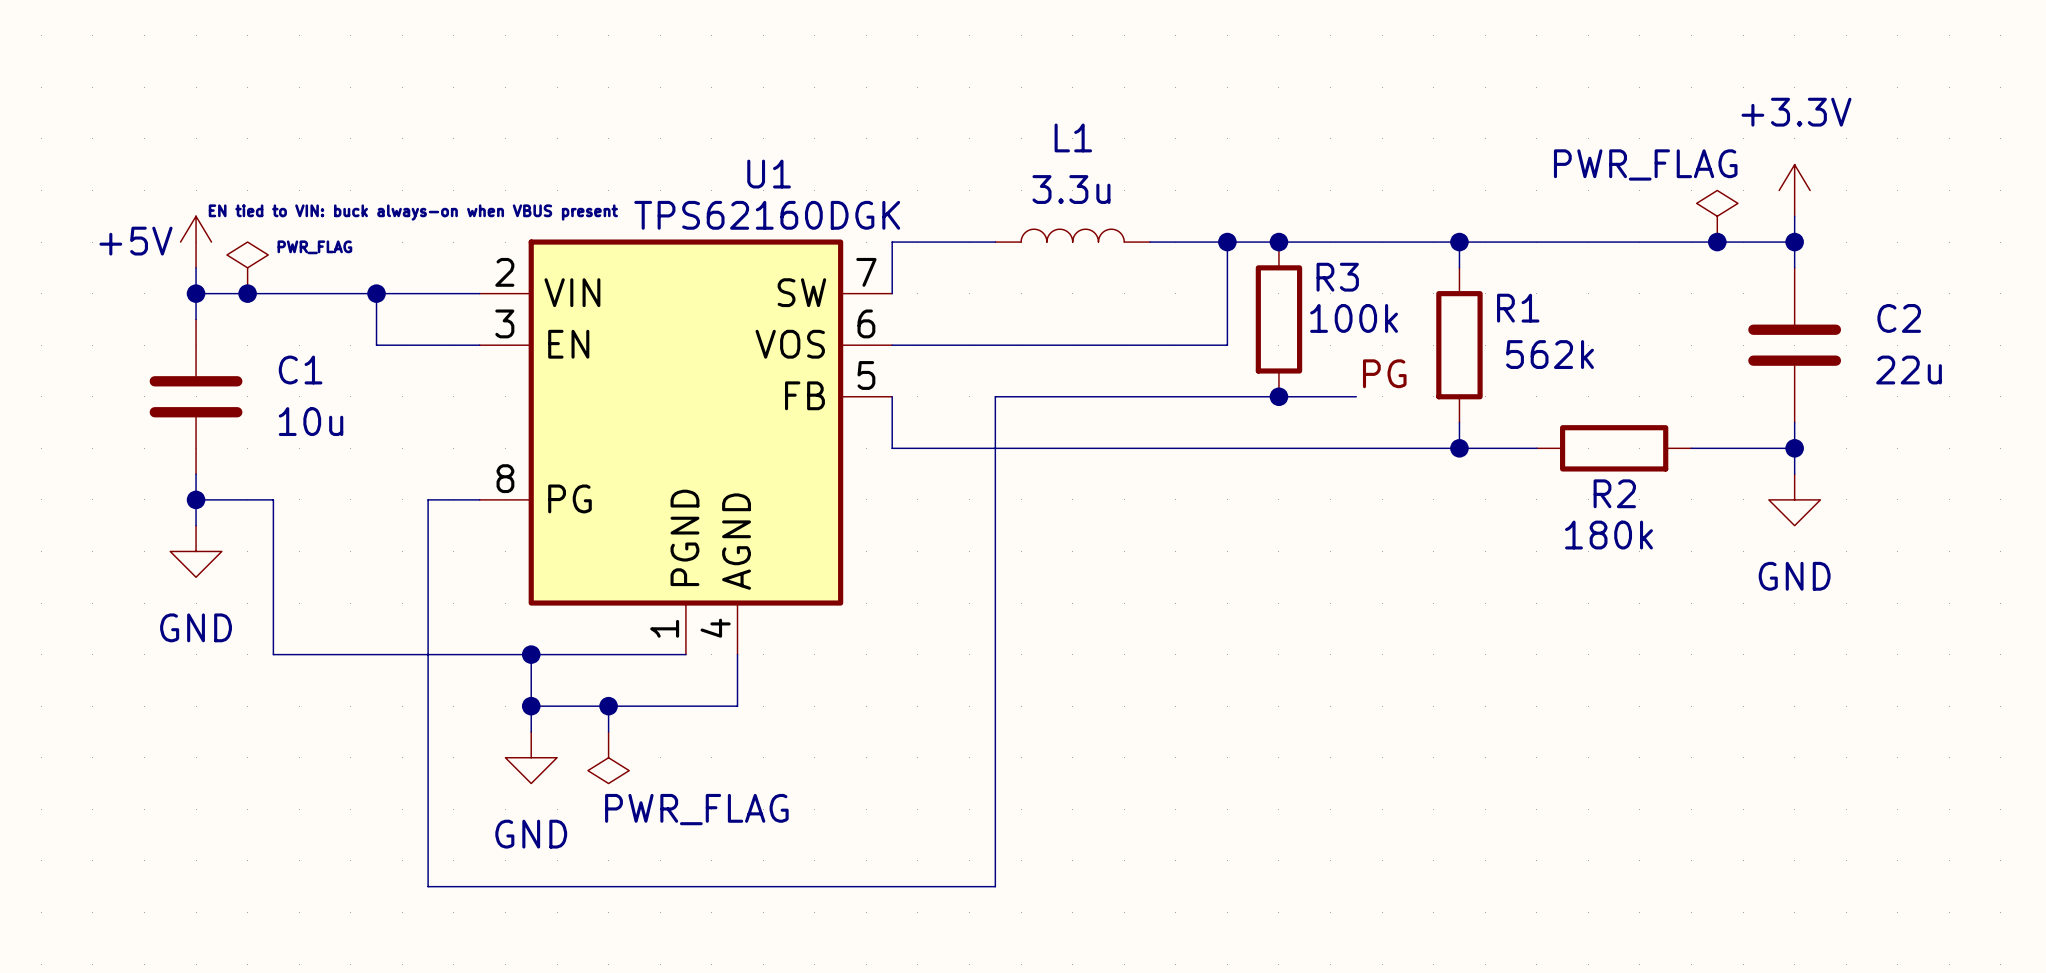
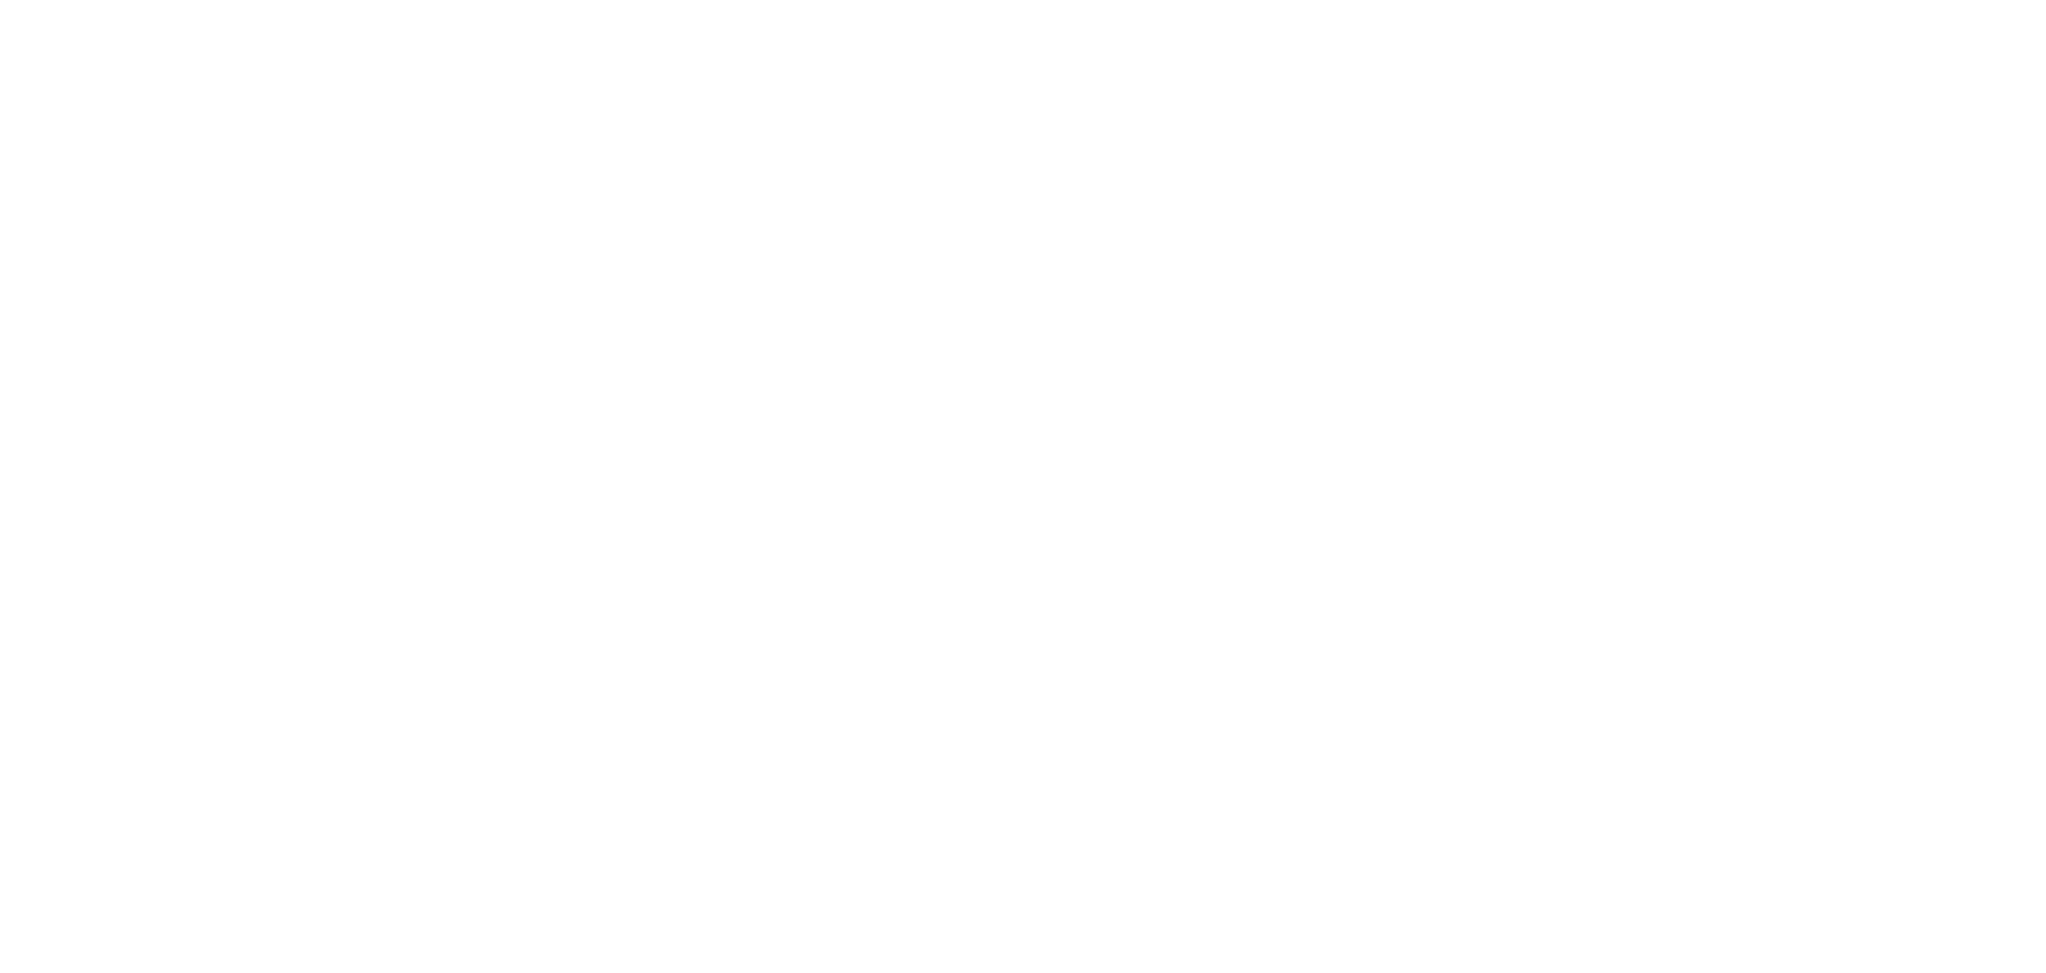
power symbol: +3.3V (1794, 190) -> none
text: EN tied to VIN: buck always-on when VBUS present (413, 212) -> none
power symbol: PWR_FLAG (1717, 216) -> none
wire: (1794, 216) (1794, 267) -> none
L1: 3.3u (1072, 235) -> none
power symbol: +5V (196, 242) -> none
wire: (995, 242) (892, 242) (892, 293) -> none
wire: (1150, 242) (1794, 242) -> none
wire: (1227, 242) (1227, 345) (892, 345) -> none
junction: (1227, 242) -> none
junction: (1278, 242) -> none
wire: (1459, 242) (1459, 267) -> none
junction: (1459, 242) -> none
junction: (1717, 242) -> none
junction: (1794, 242) -> none
wire: (196, 267) (196, 319) -> none
power symbol: PWR_FLAG (247, 267) -> none
wire: (196, 293) (479, 293) -> none
junction: (196, 293) -> none
junction: (247, 293) -> none
wire: (376, 293) (376, 345) (479, 345) -> none
junction: (376, 293) -> none
R3: 100k (1278, 319) -> none
R1: 562k (1459, 345) -> none
C2: 22u (1794, 345) -> none
label: PG (1384, 373) -> none
C1: 10u (196, 396) -> none
wire: (892, 396) (892, 448) (1536, 448) -> none
junction: (1278, 396) -> none
wire: (1356, 396) (995, 396) (995, 886) (428, 886) (428, 499) (479, 499) -> none
wire: (1459, 422) (1459, 448) -> none
wire: (1794, 422) (1794, 474) -> none
U1: TPS62160DGK (685, 447) -> none
junction: (1459, 448) -> none
R2: 180k (1614, 448) -> none
wire: (1691, 448) (1794, 448) -> none
junction: (1794, 448) -> none
wire: (196, 474) (196, 525) -> none
wire: (196, 499) (273, 499) (273, 654) (685, 654) -> none
junction: (196, 499) -> none
power symbol: GND (1794, 499) -> none
power symbol: GND (196, 551) -> none
wire: (531, 654) (531, 731) -> none
junction: (531, 654) -> none
wire: (737, 654) (737, 706) (531, 706) -> none
junction: (531, 706) -> none
wire: (608, 706) (608, 731) -> none
junction: (608, 706) -> none
power symbol: GND (531, 757) -> none
power symbol: PWR_FLAG (608, 757) -> none

